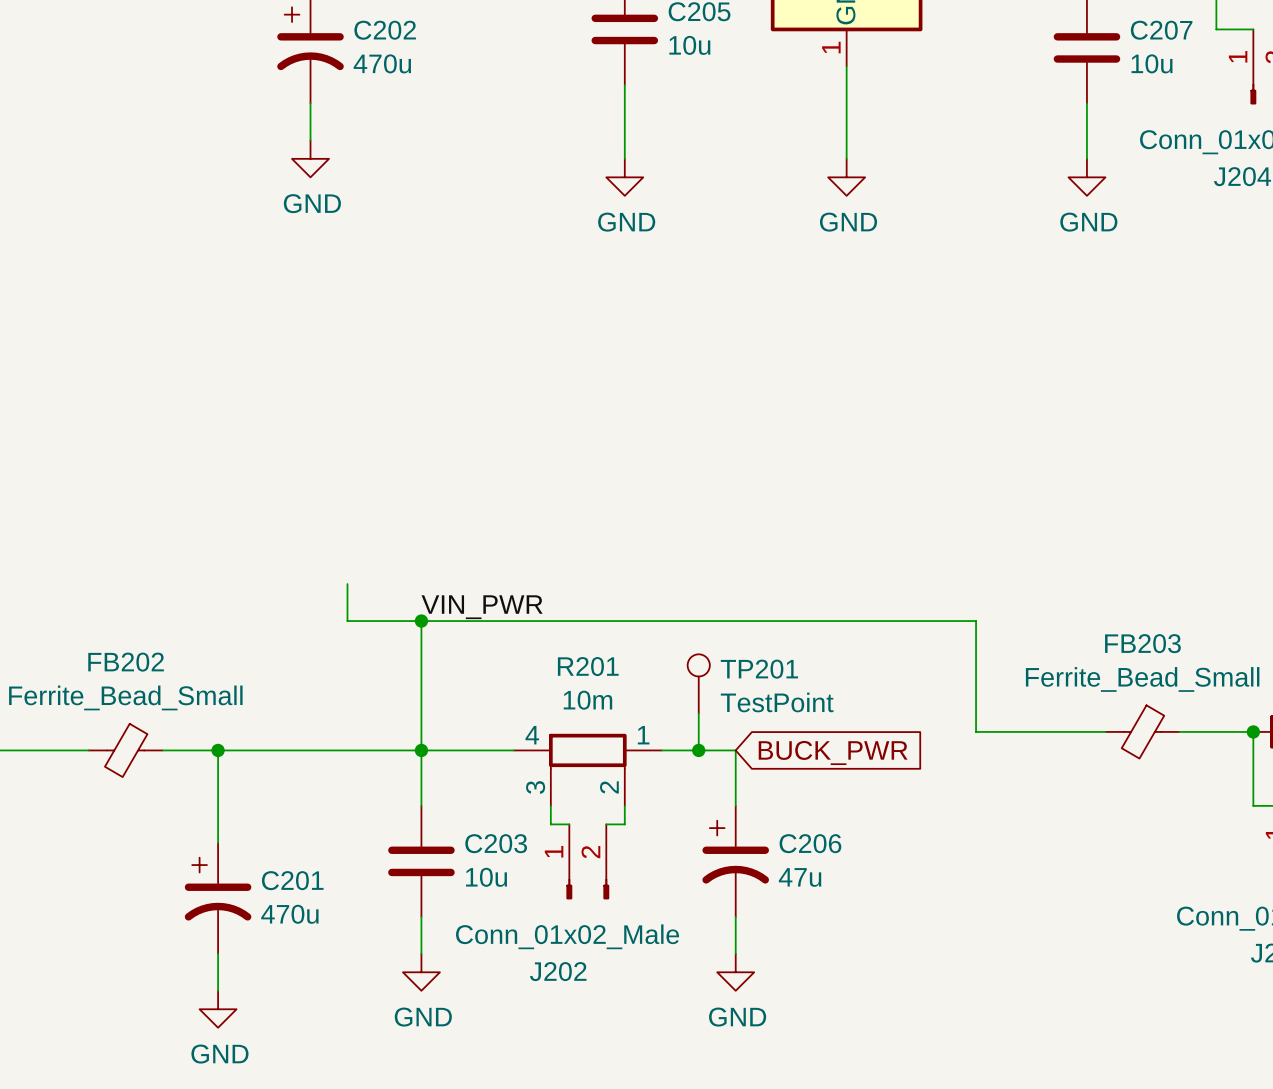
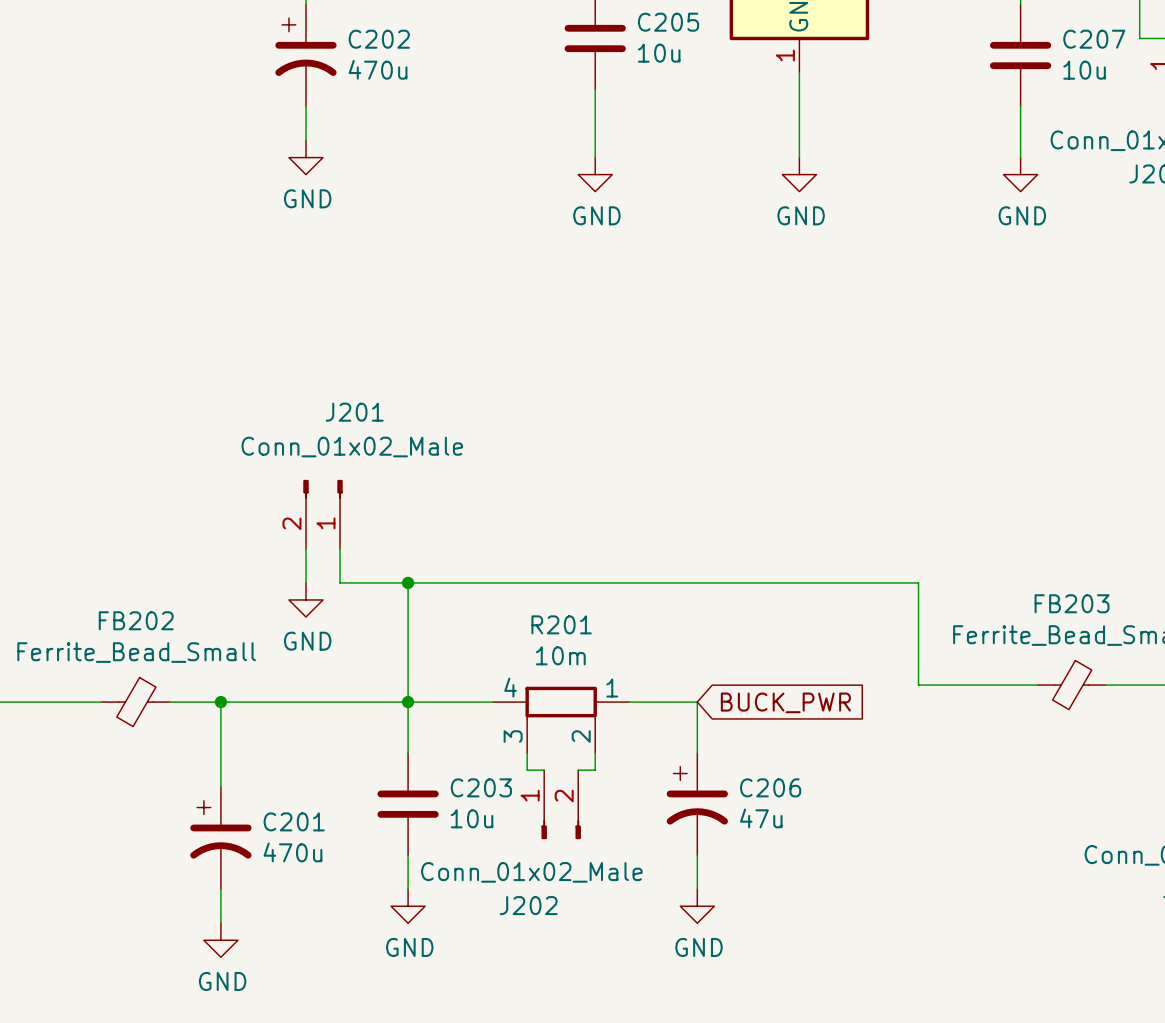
J201: none -> Conn_01x02_Male (322, 514)
wire: none -> (305, 548) (305, 582)
label: VIN_PWR (482, 607) -> none
power symbol: none -> GND (305, 599)
TP201: TestPoint (698, 683) -> none
wire: (698, 713) (698, 750) -> none
junction: (698, 750) -> none

